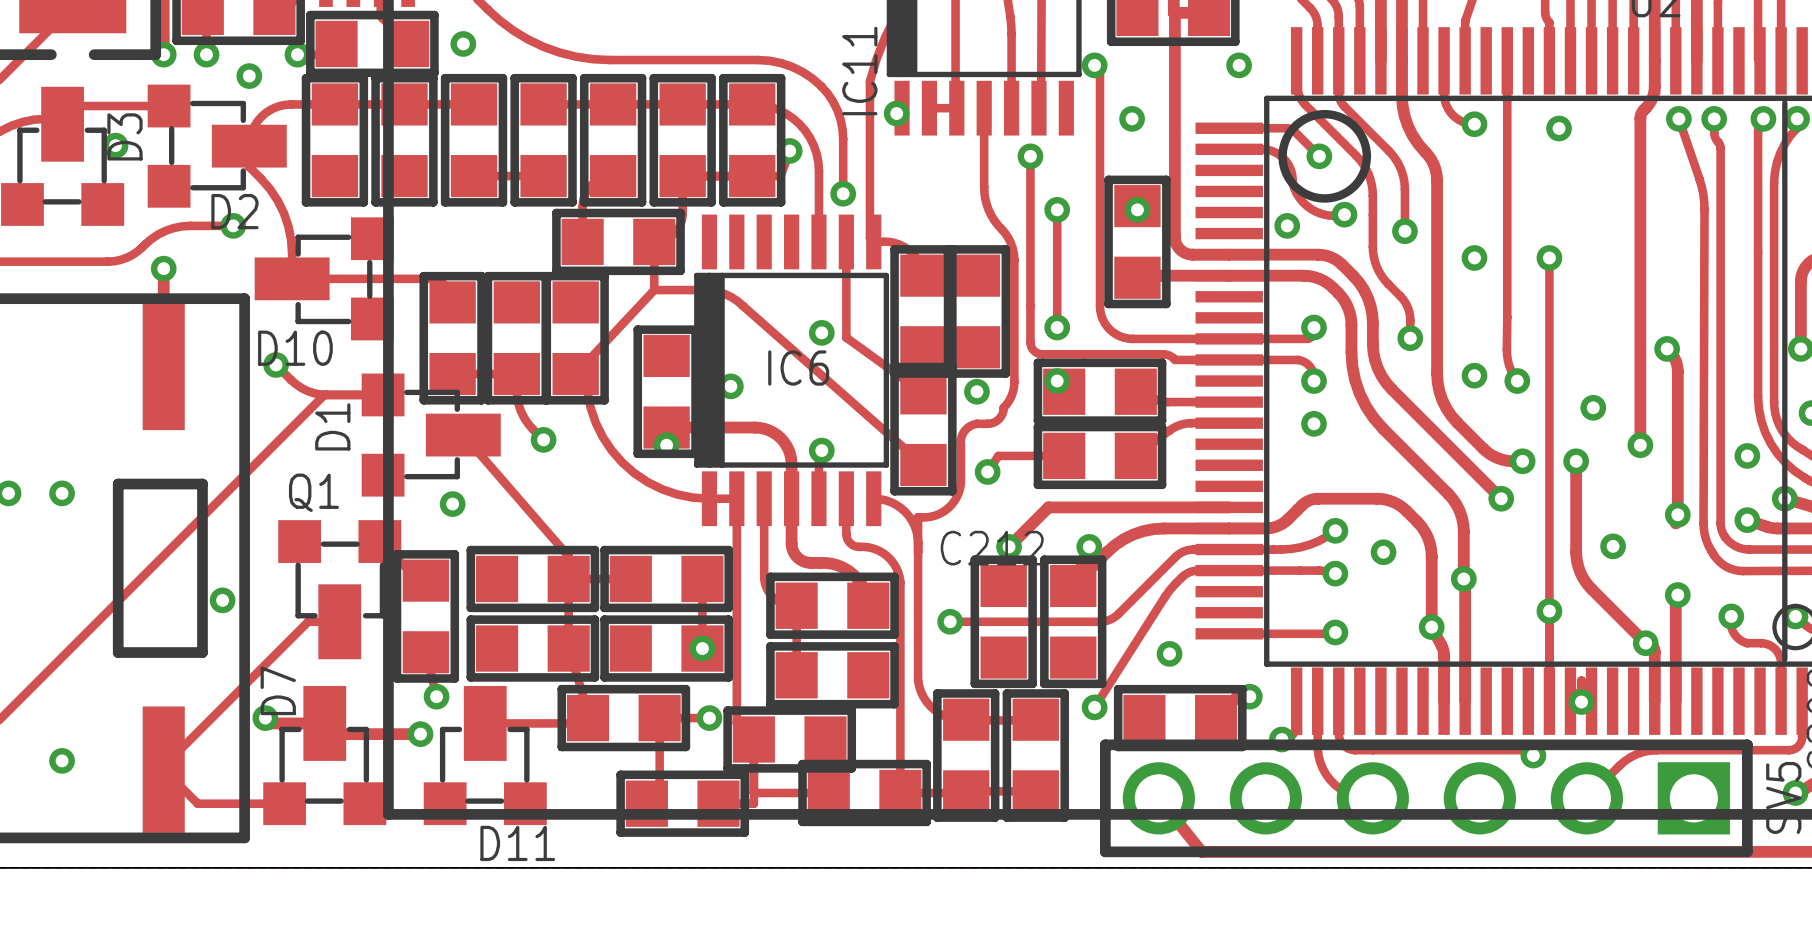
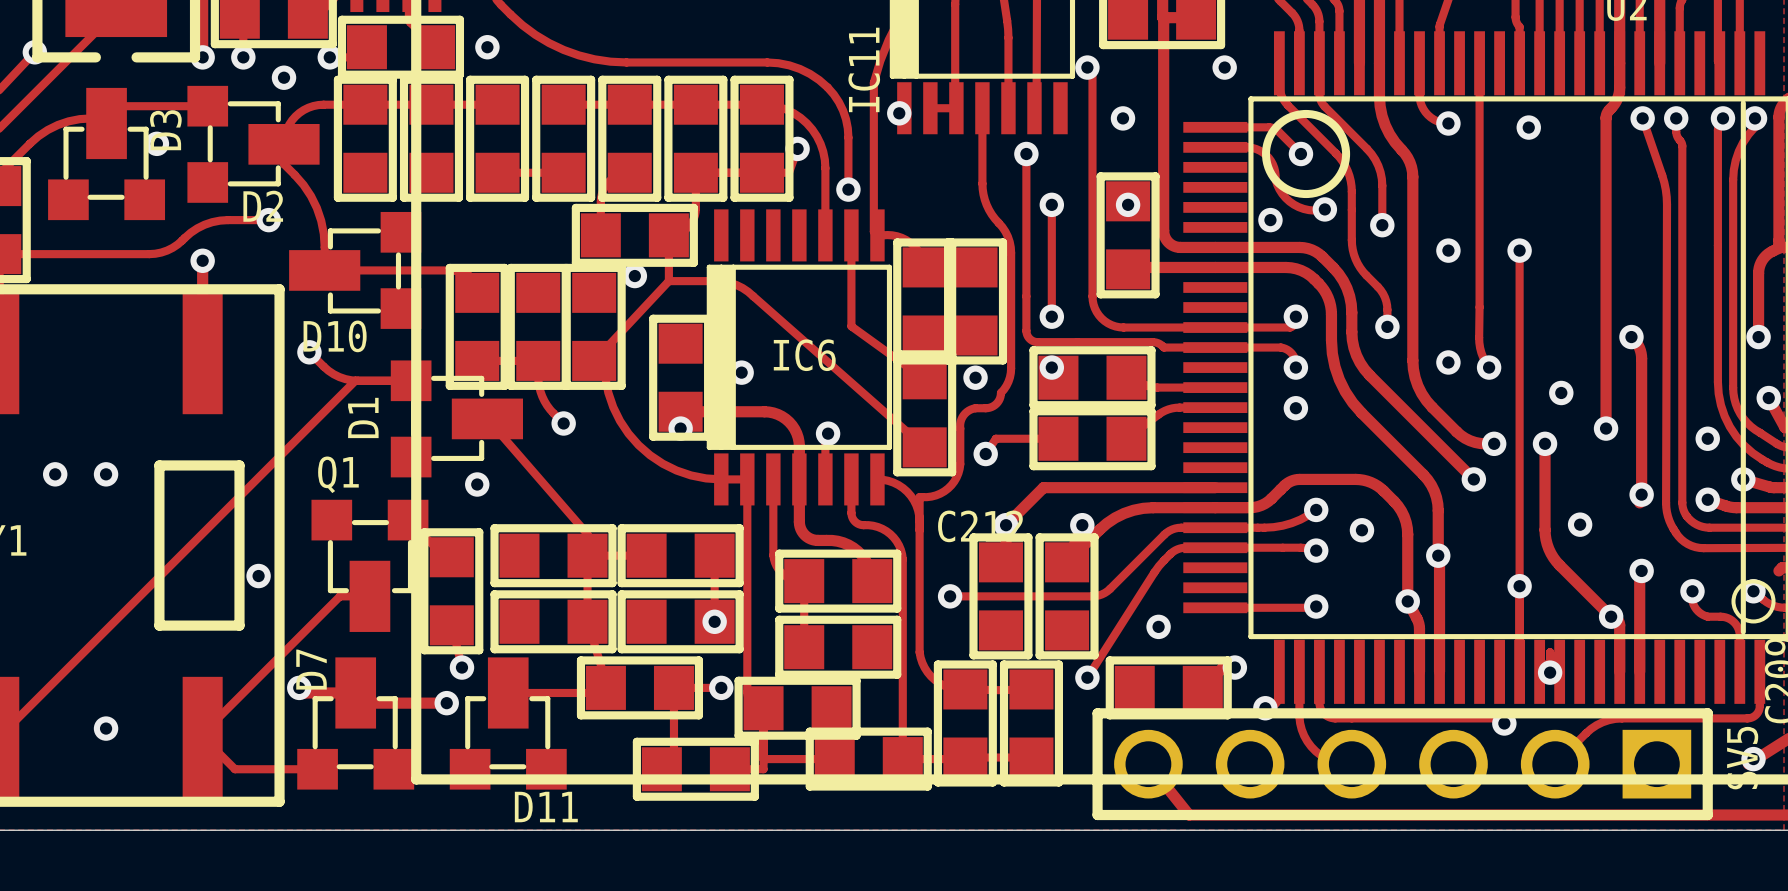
via position: (821, 332) -> (634, 276)

